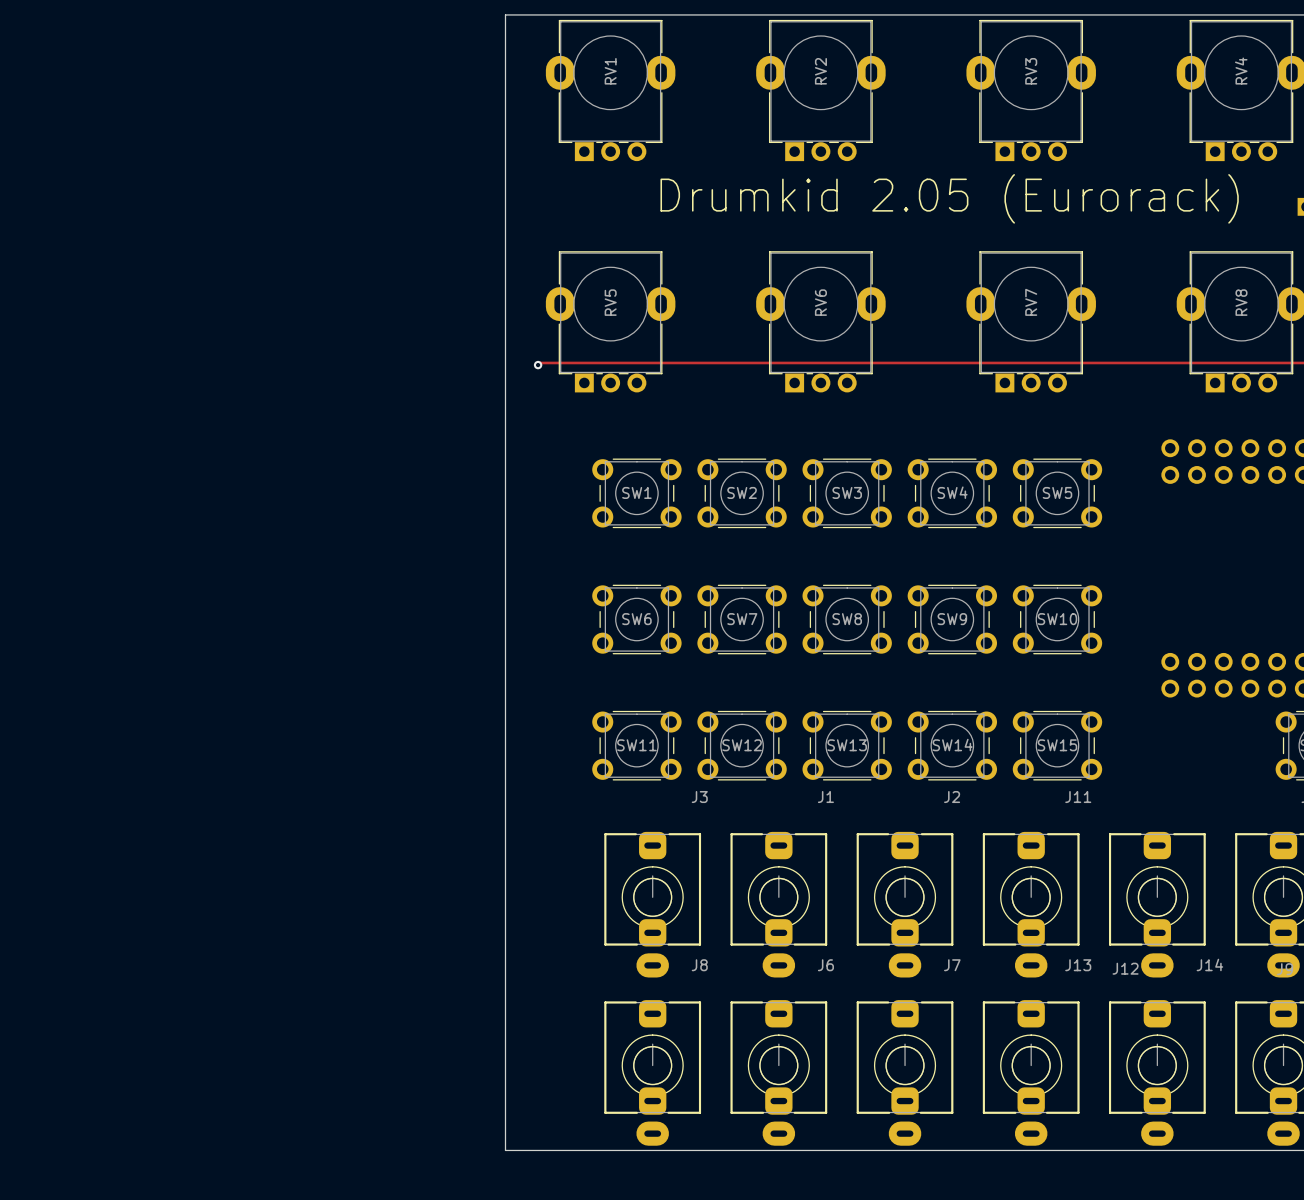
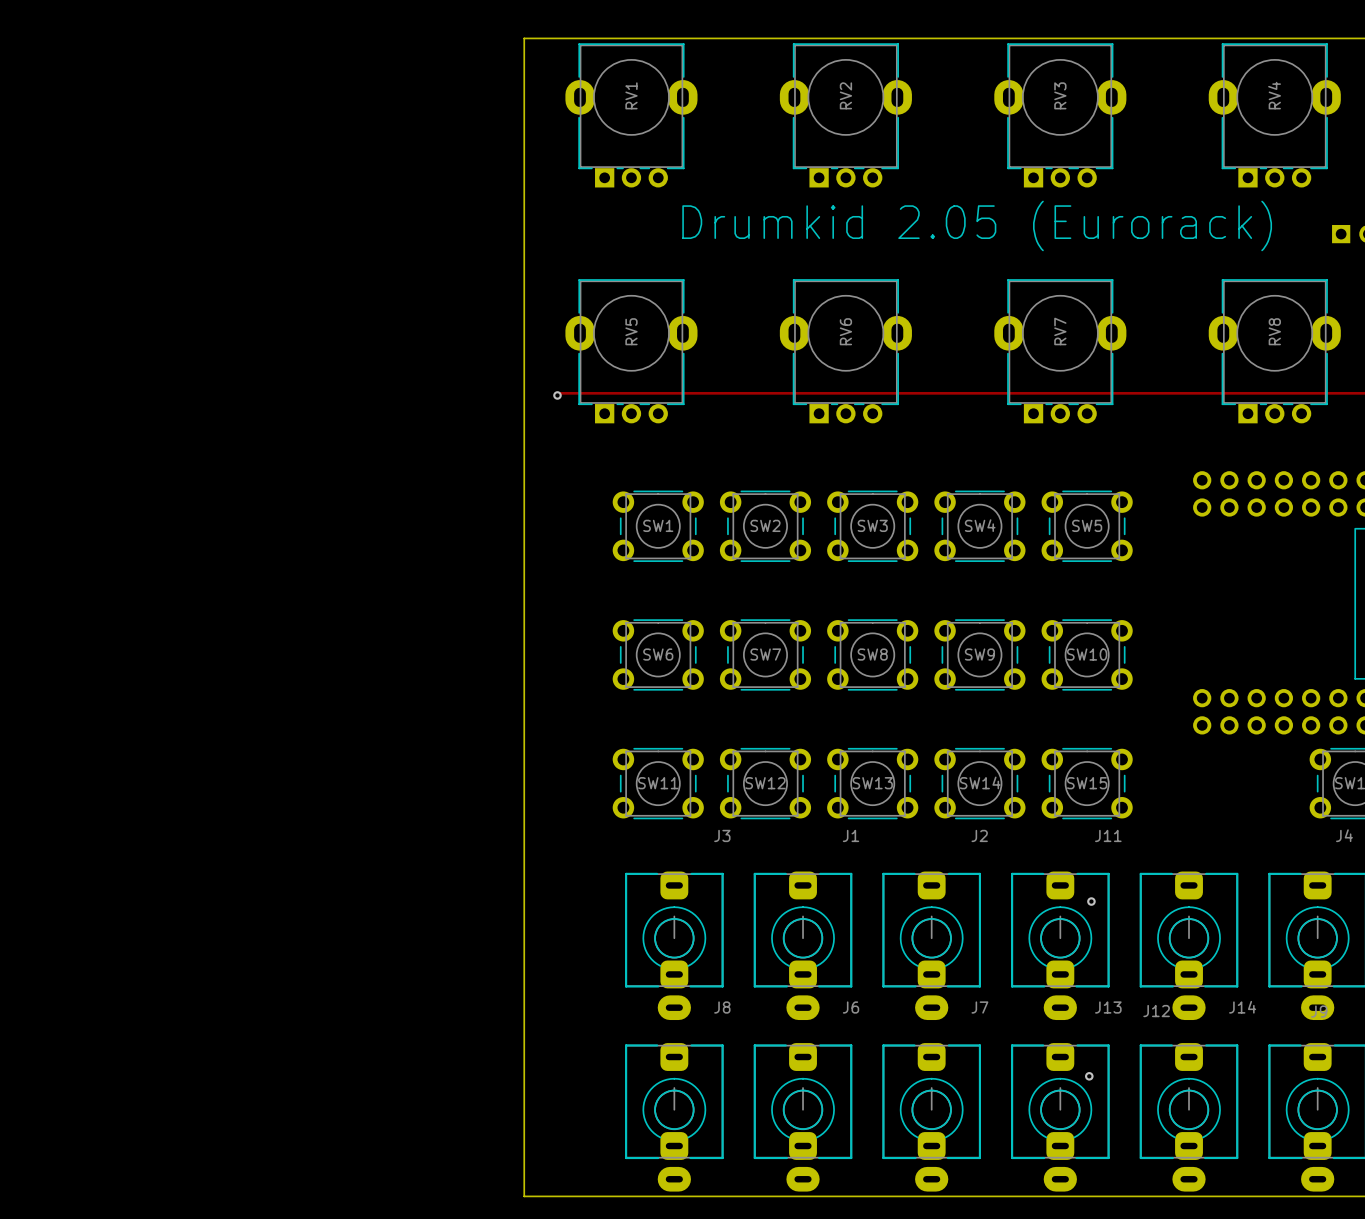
via: none -> (1091, 901)
via: none -> (1089, 1076)

